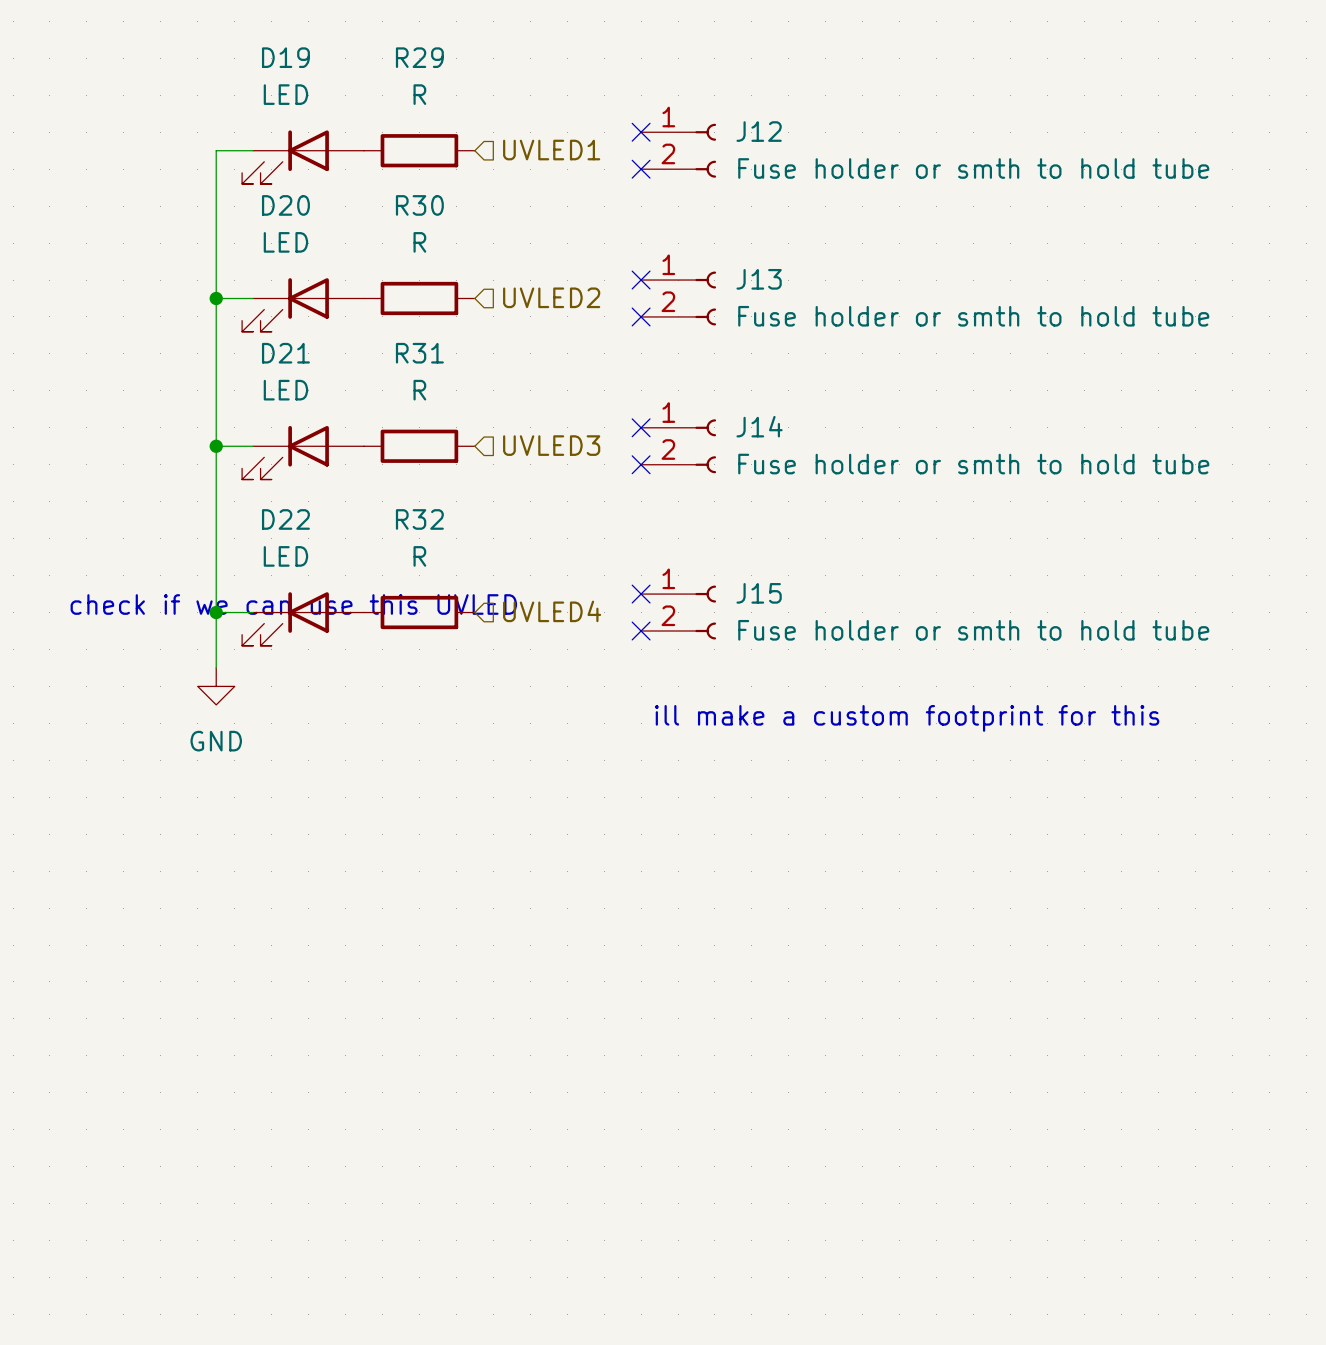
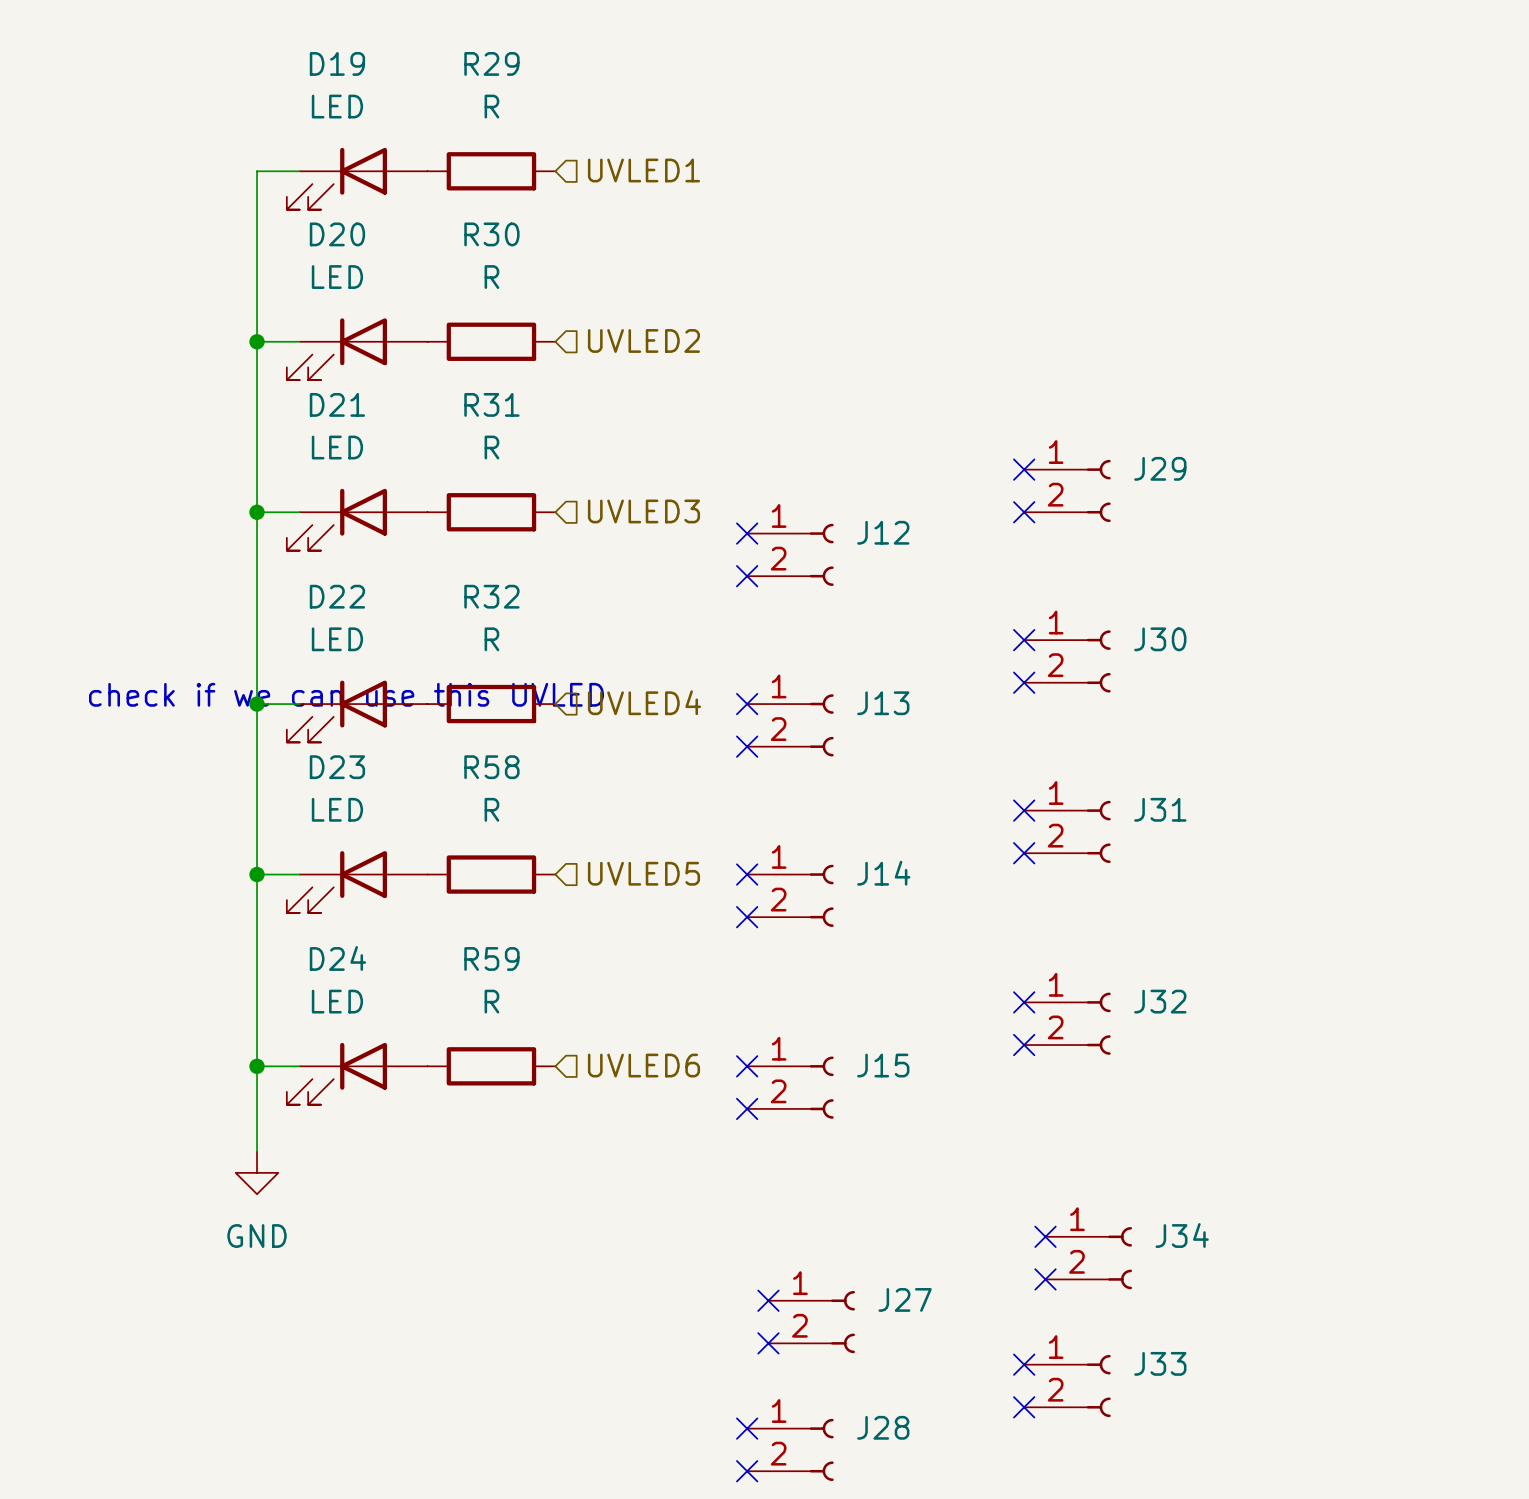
no-connect mark: (641, 132) -> none
J12 position: (678, 150) -> (790, 554)
J12 value: Fuse holder or smth to hold tube (973, 168) -> none
no-connect mark: (641, 169) -> none
no-connect mark: (641, 280) -> none
J13 position: (678, 298) -> (790, 725)
no-connect mark: (641, 316) -> none
J13 value: Fuse holder or smth to hold tube (973, 316) -> none
no-connect mark: none -> (1024, 469)
no-connect mark: (641, 427) -> none
J29: none -> (1067, 490)
J14 position: (678, 446) -> (790, 895)
no-connect mark: none -> (1024, 512)
J14 value: Fuse holder or smth to hold tube (973, 464) -> none
no-connect mark: none -> (747, 576)
no-connect mark: none -> (1024, 640)
J30: none -> (1067, 661)
no-connect mark: (641, 594) -> none
no-connect mark: none -> (1024, 682)
no-connect mark: none -> (747, 704)
J15 position: (678, 612) -> (790, 1087)
J15 value: Fuse holder or smth to hold tube (973, 630) -> none
no-connect mark: (641, 631) -> none
no-connect mark: none -> (747, 746)
wire: none -> (257, 767) (257, 1151)
power symbol position: GND (216, 686) -> GND (257, 1172)
no-connect mark: none -> (1024, 810)
text: ill make a custom footprint for this (907, 718) -> none
J31: none -> (1067, 831)
no-connect mark: none -> (1024, 853)
hierarchical label: none -> UVLED5 (643, 873)
wire: none -> (257, 874) (299, 874)
junction: none -> (257, 874)
R58: none -> R (491, 874)
no-connect mark: none -> (747, 874)
D23: none -> LED (357, 881)
no-connect mark: none -> (747, 917)
no-connect mark: none -> (1024, 1002)
J32: none -> (1067, 1023)
no-connect mark: none -> (1024, 1045)
hierarchical label: none -> UVLED6 (643, 1065)
wire: none -> (257, 1066) (299, 1066)
junction: none -> (257, 1066)
R59: none -> R (491, 1066)
no-connect mark: none -> (747, 1066)
D24: none -> LED (357, 1073)
no-connect mark: none -> (747, 1108)
no-connect mark: none -> (1045, 1236)
J34: none -> (1088, 1258)
no-connect mark: none -> (1045, 1279)
no-connect mark: none -> (768, 1300)
J27: none -> (811, 1322)
no-connect mark: none -> (768, 1343)
no-connect mark: none -> (1024, 1364)
J33: none -> (1067, 1385)
no-connect mark: none -> (1024, 1407)
no-connect mark: none -> (747, 1428)
J28: none -> (790, 1449)
no-connect mark: none -> (747, 1471)

